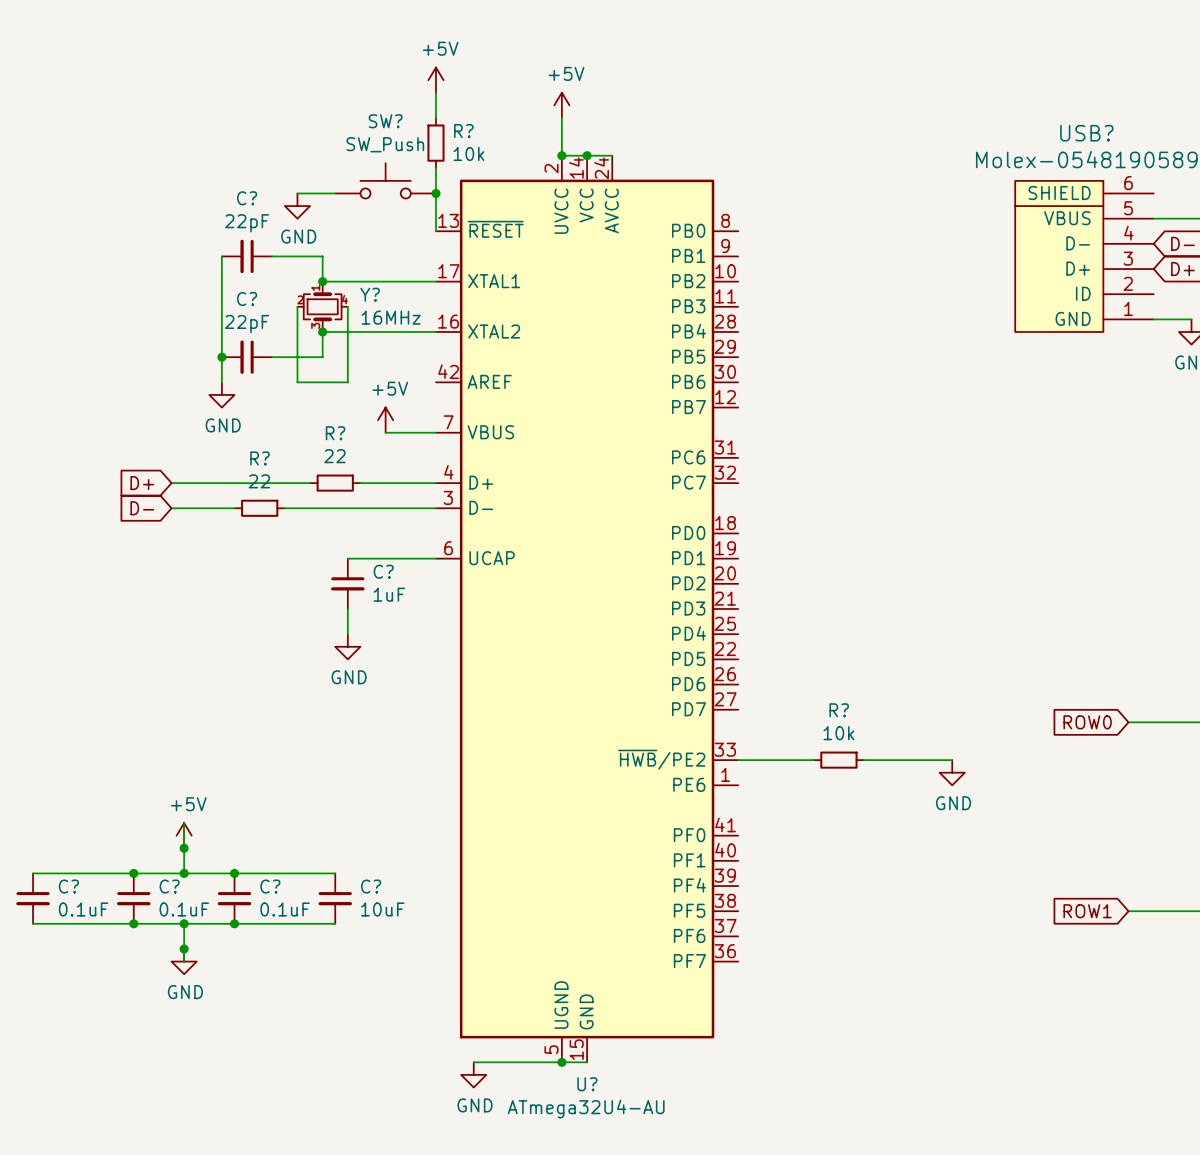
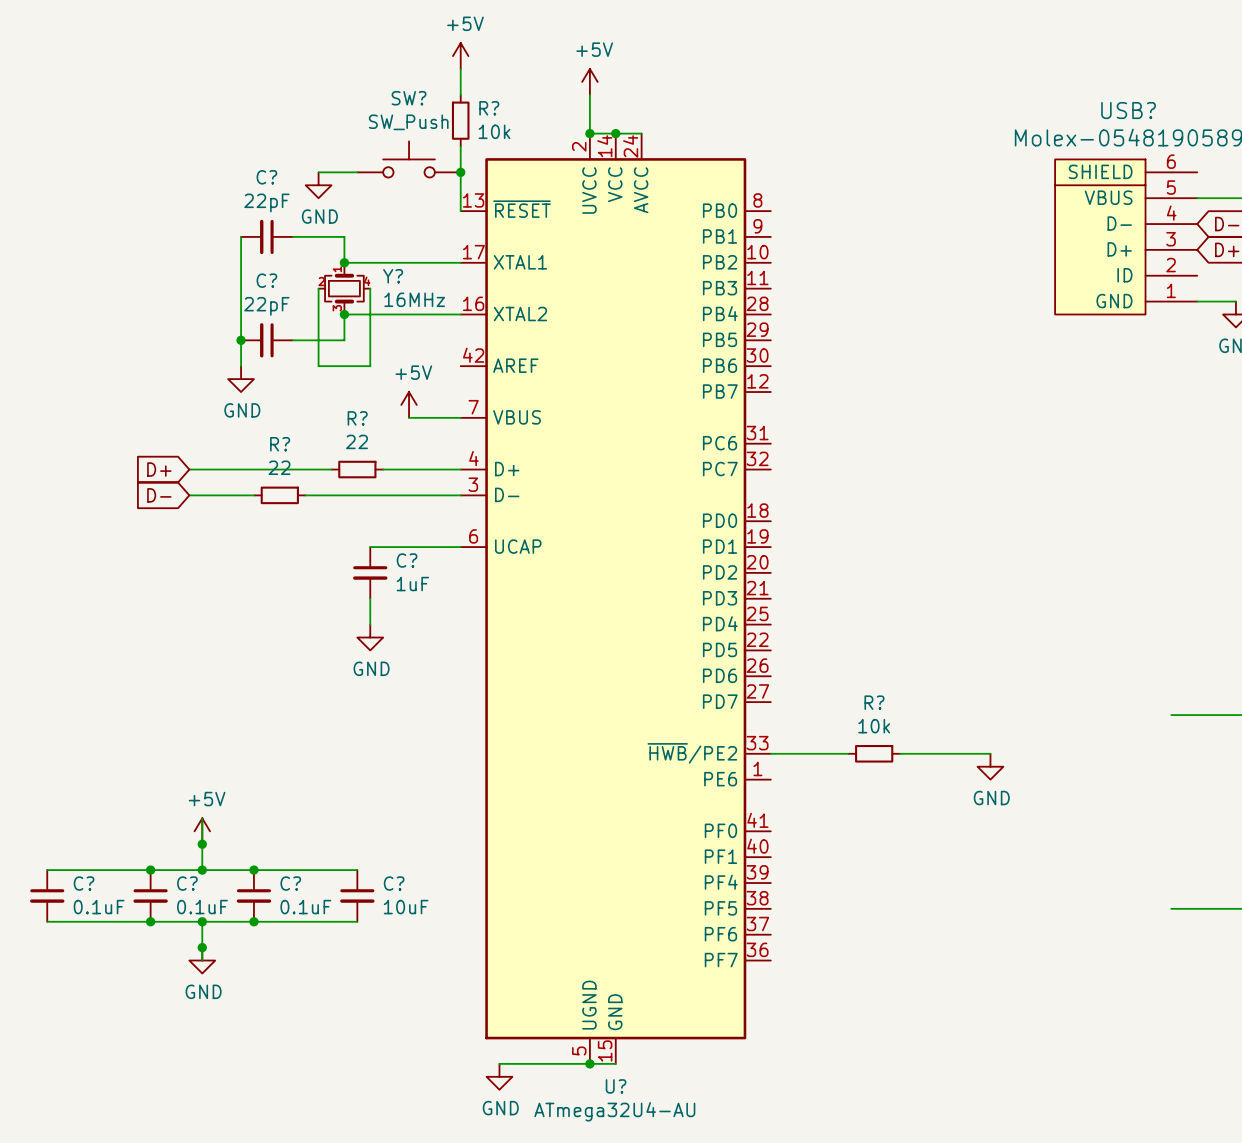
global label: ROW0 (1087, 722) -> none
global label: ROW1 (1087, 911) -> none

